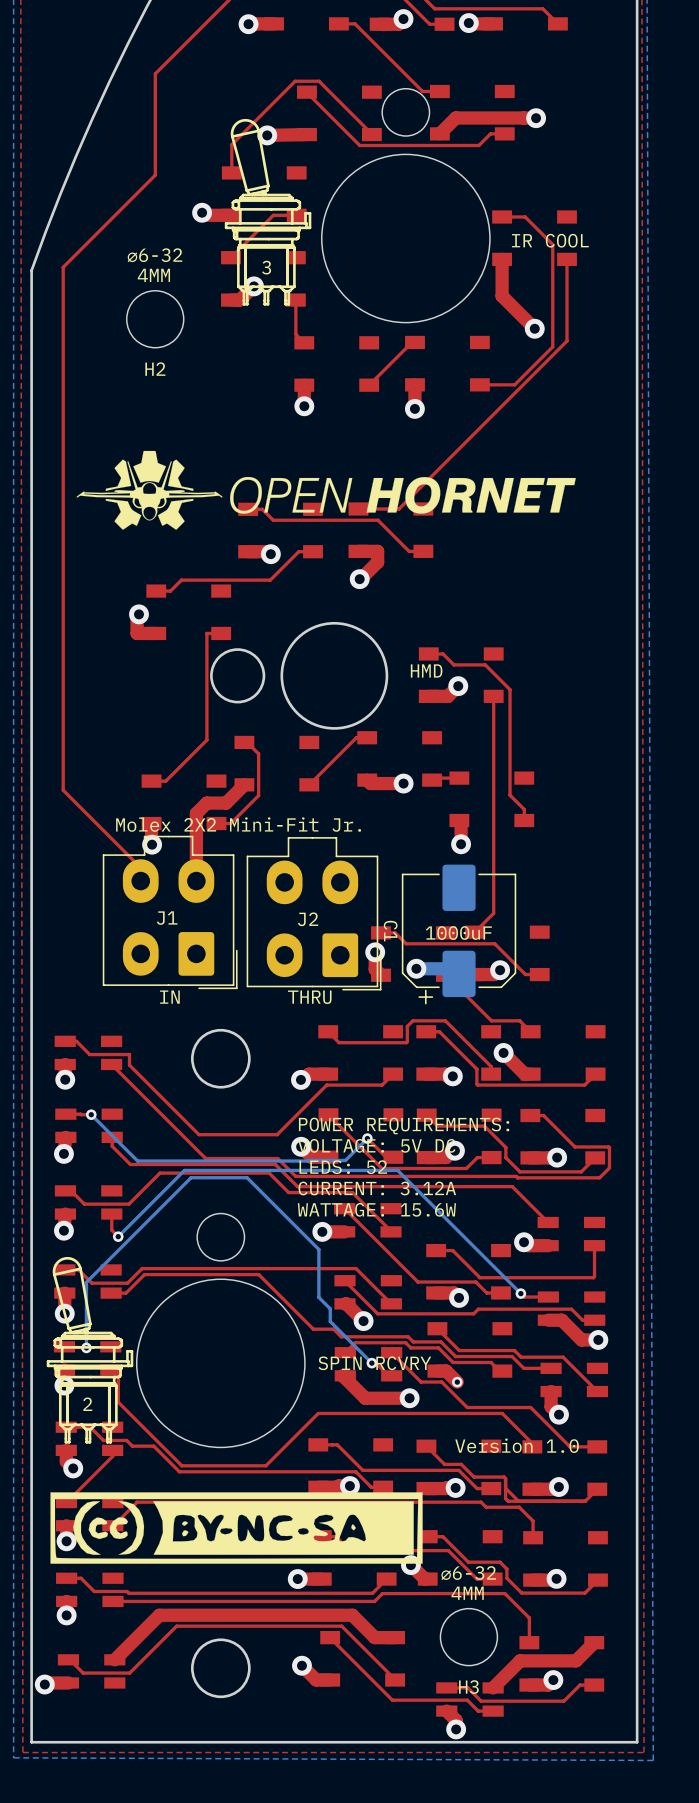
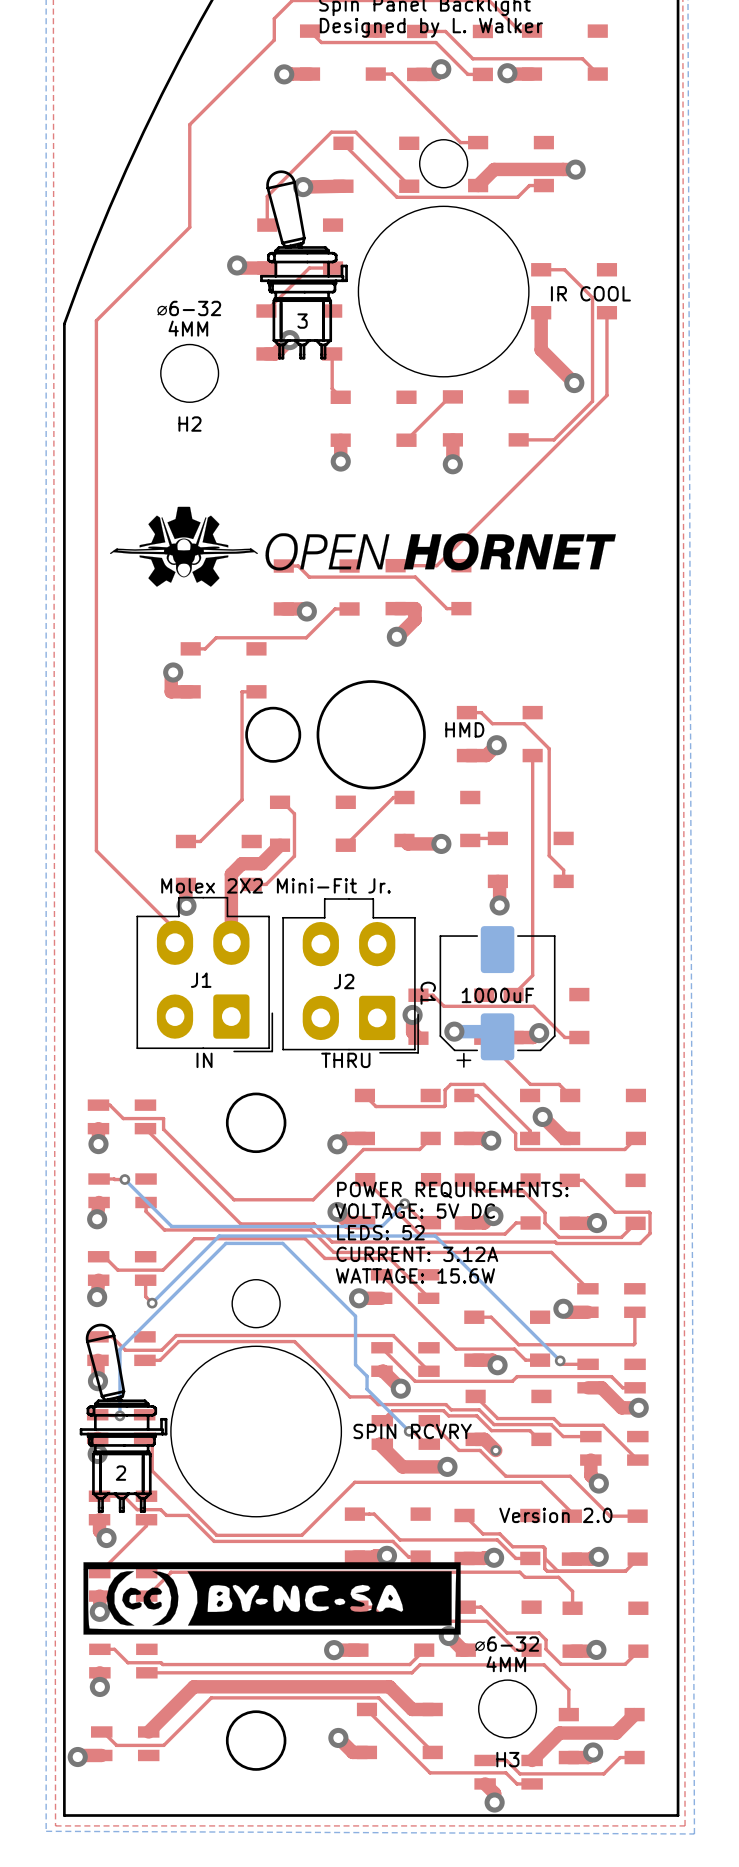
text: Version 1.0 (517, 1445) -> Version 2.0 (555, 1515)

